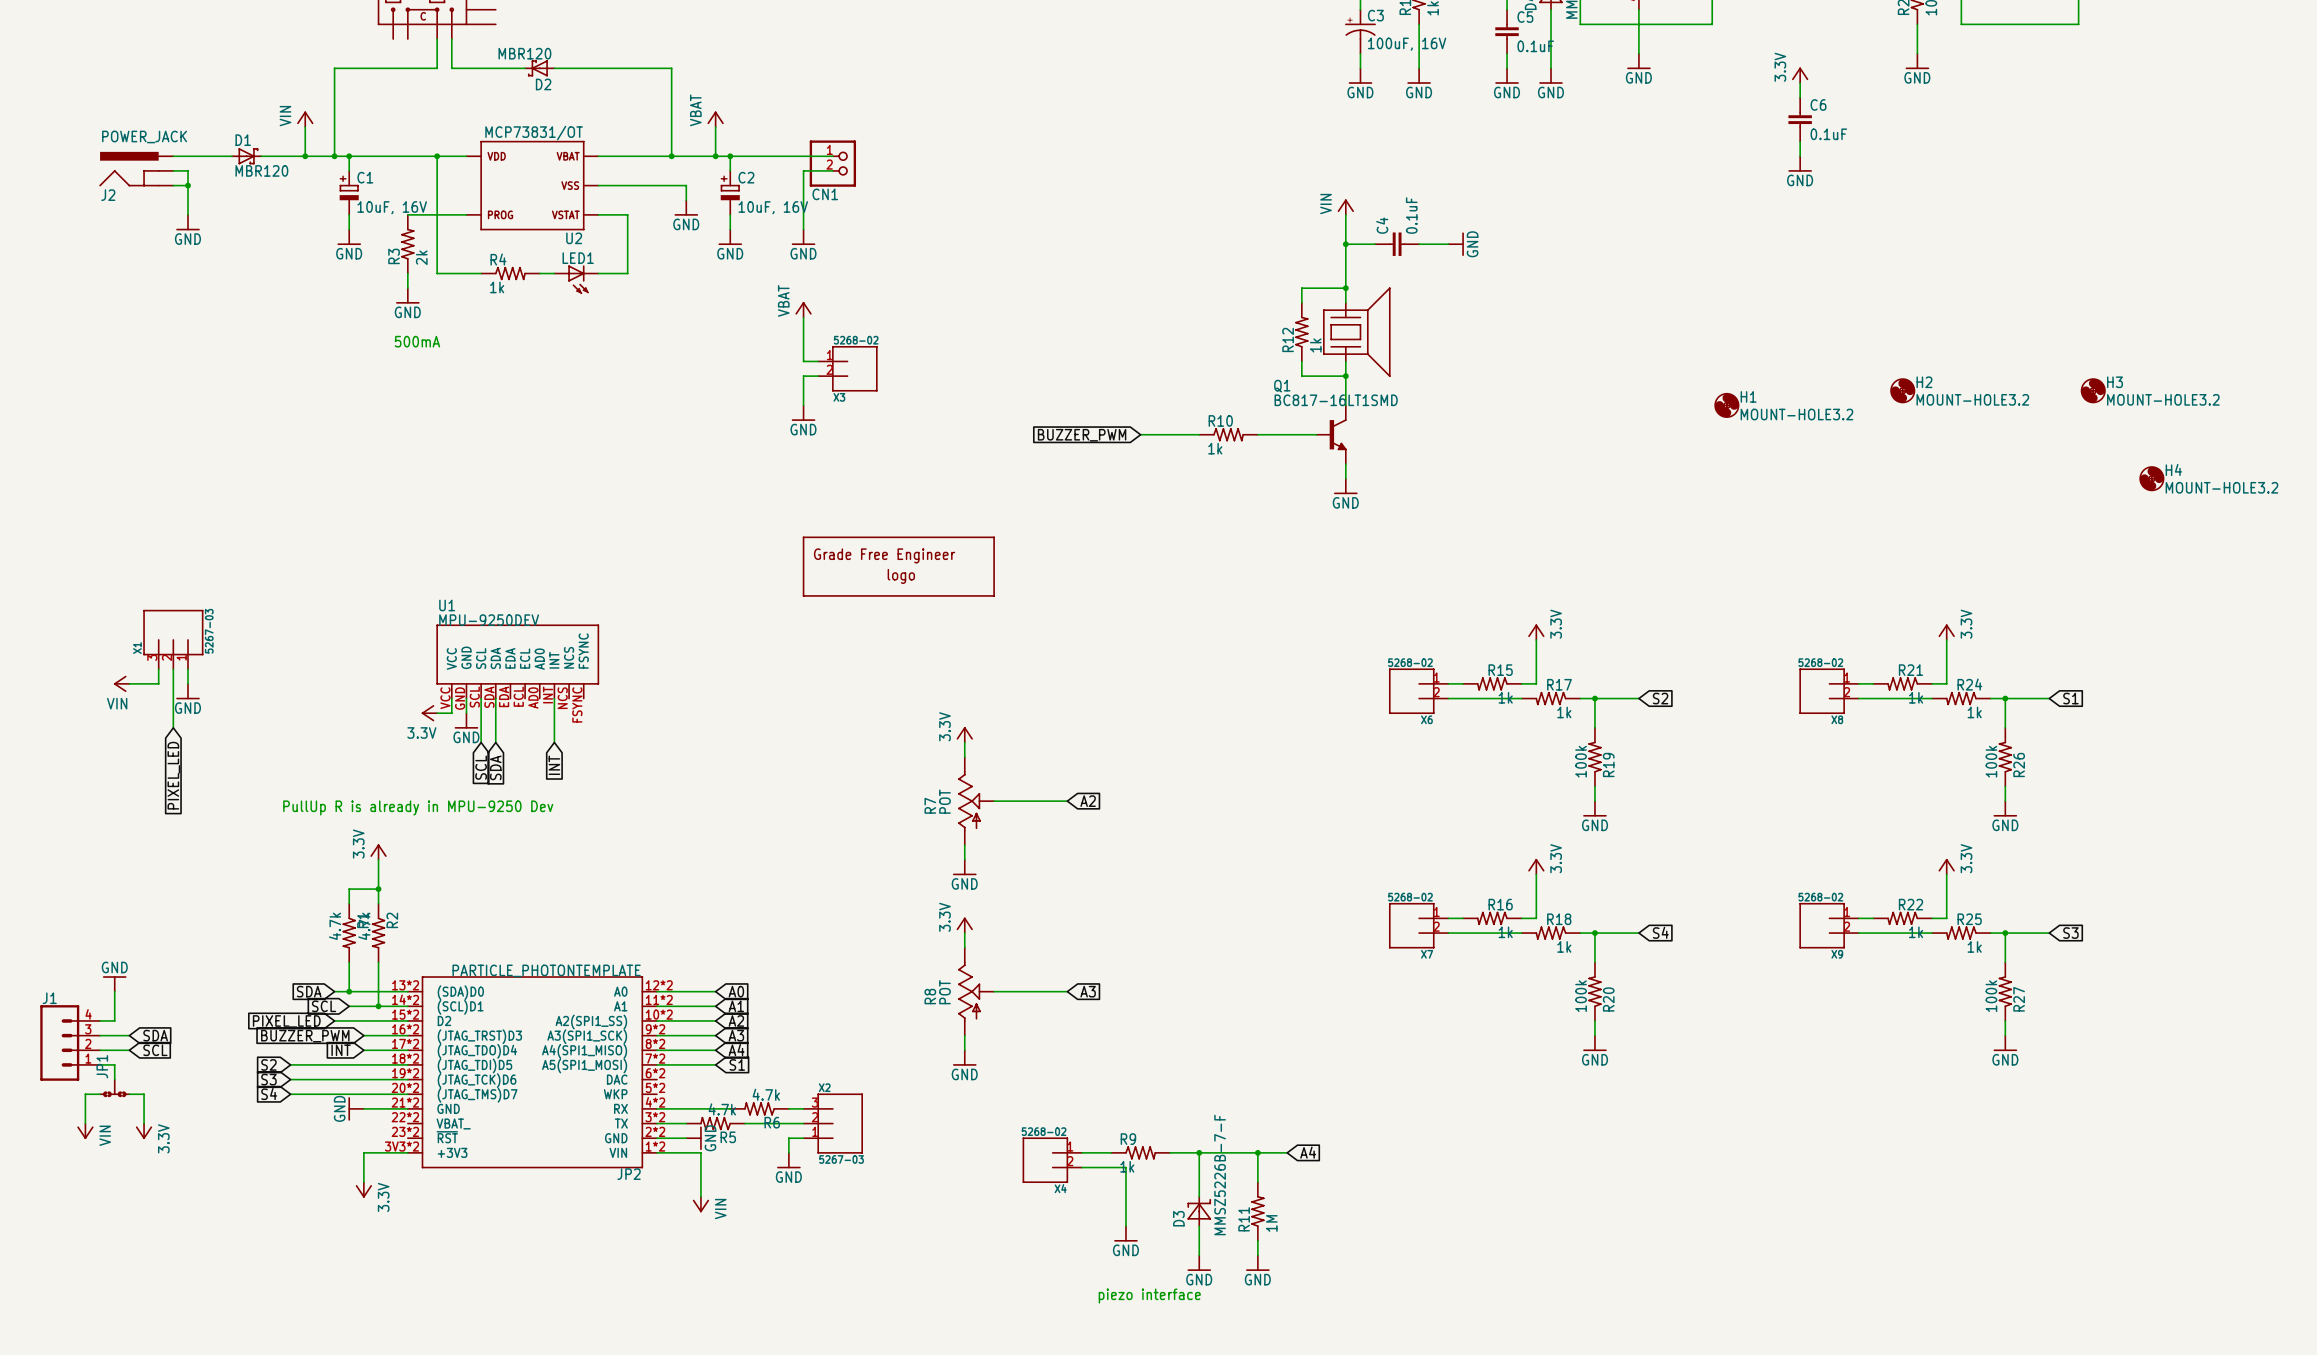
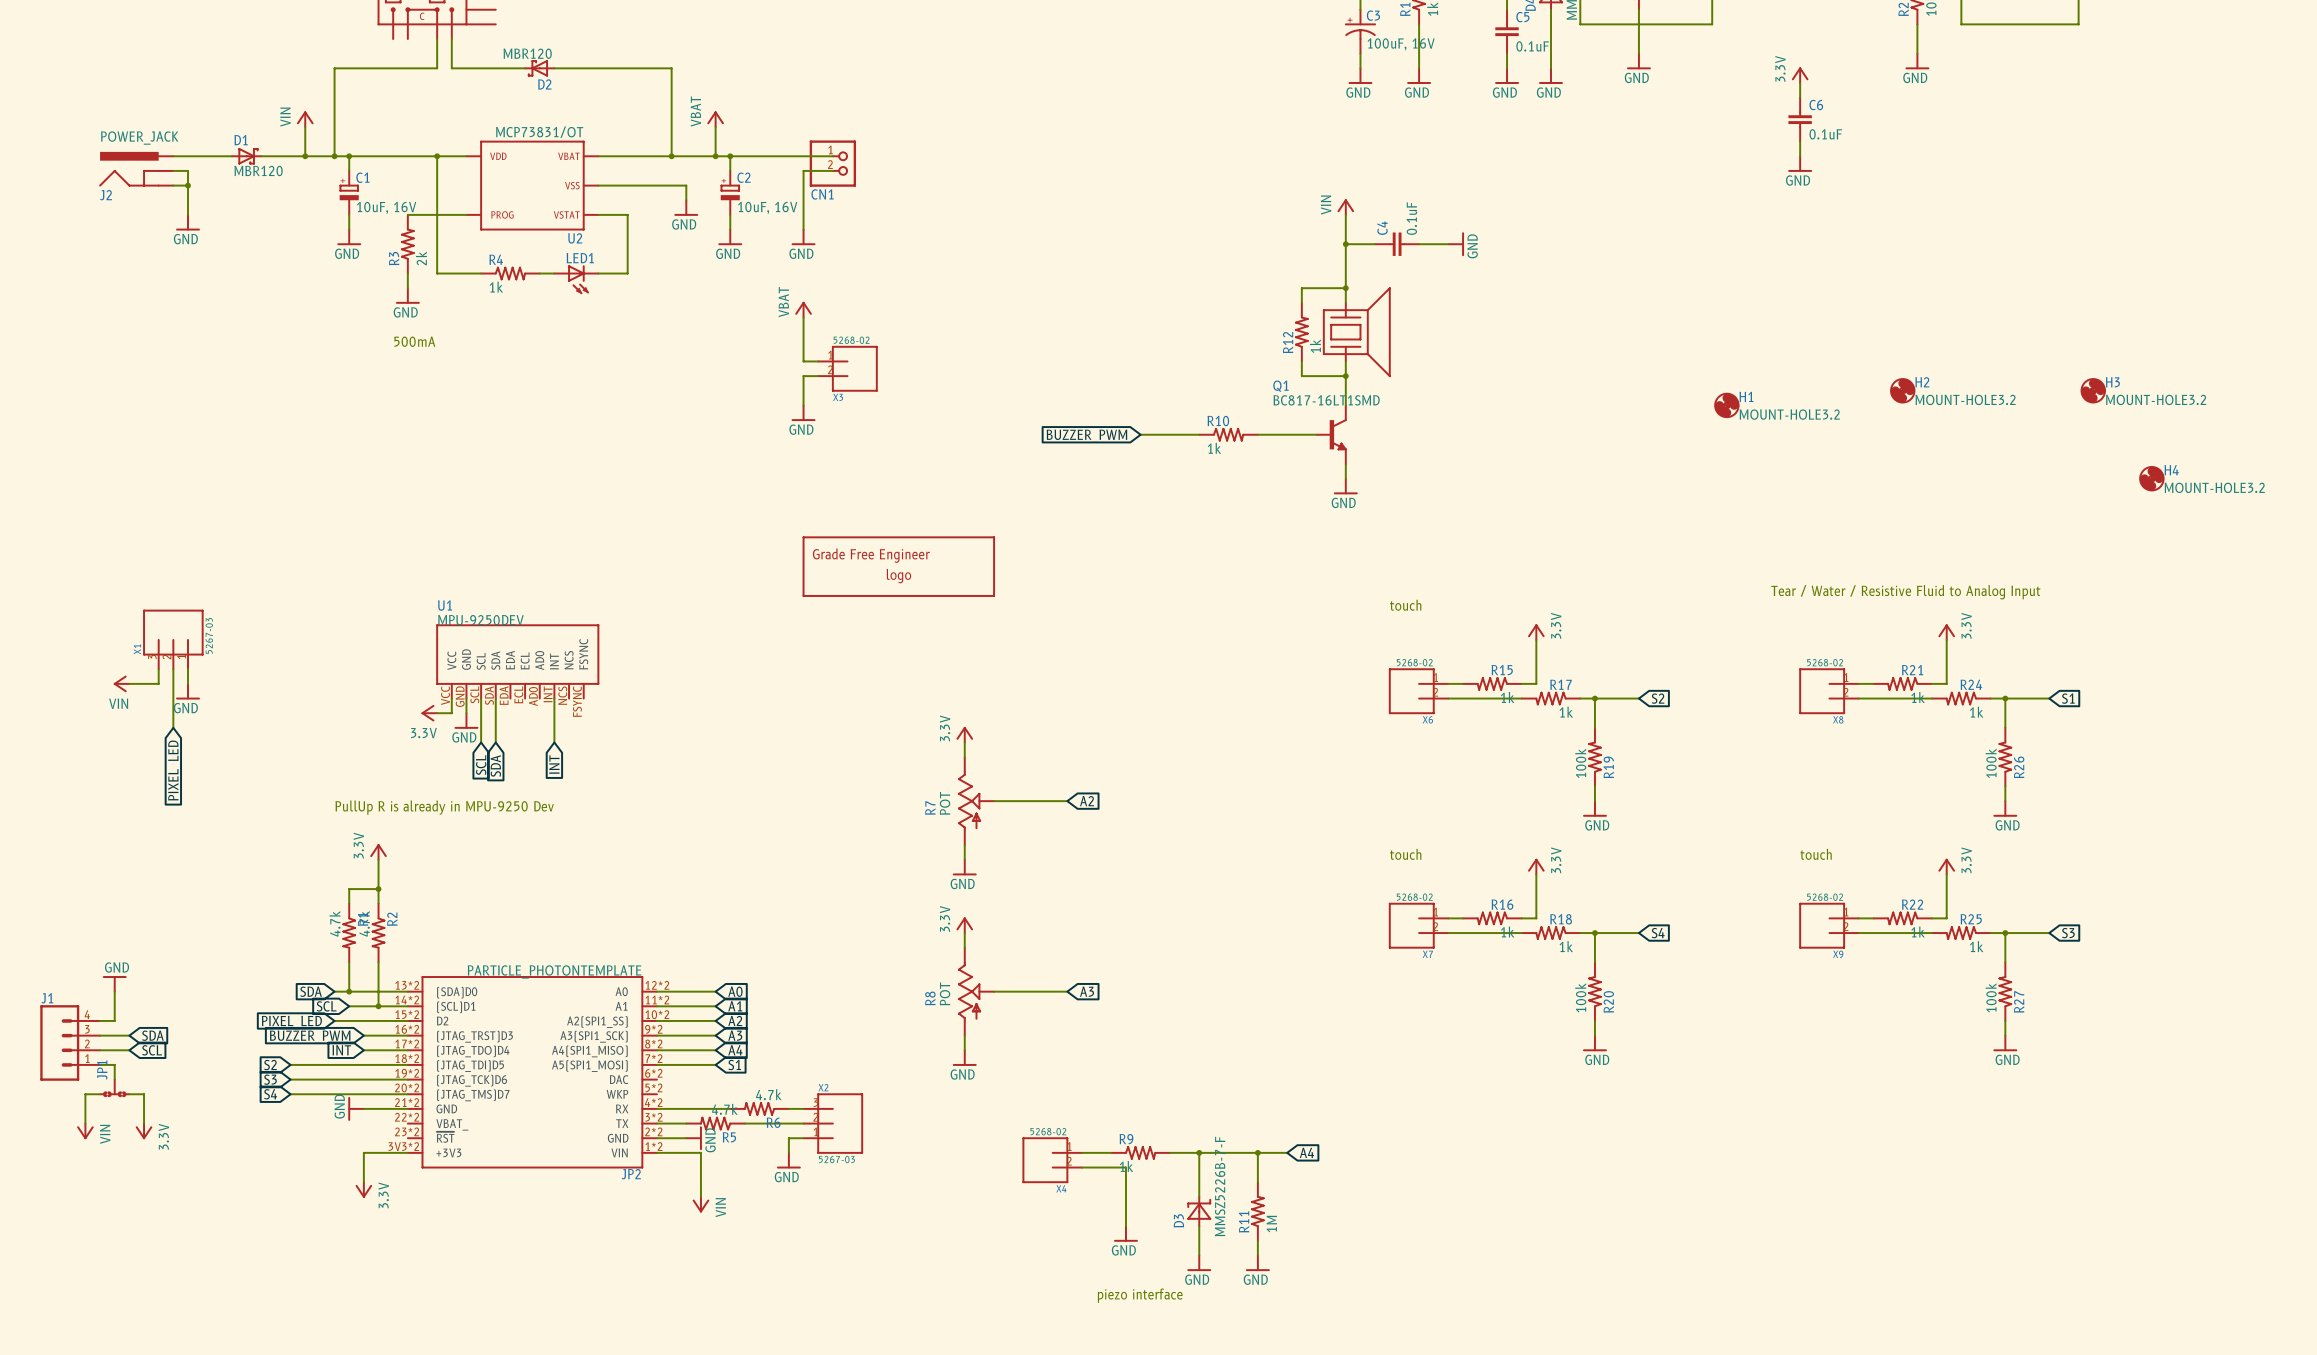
text: none -> Tear / Water / Resistive Fluid to Analog Input (1905, 592)
text: none -> touch (1405, 605)
text: none -> touch (1405, 854)
text: none -> touch (1816, 854)

